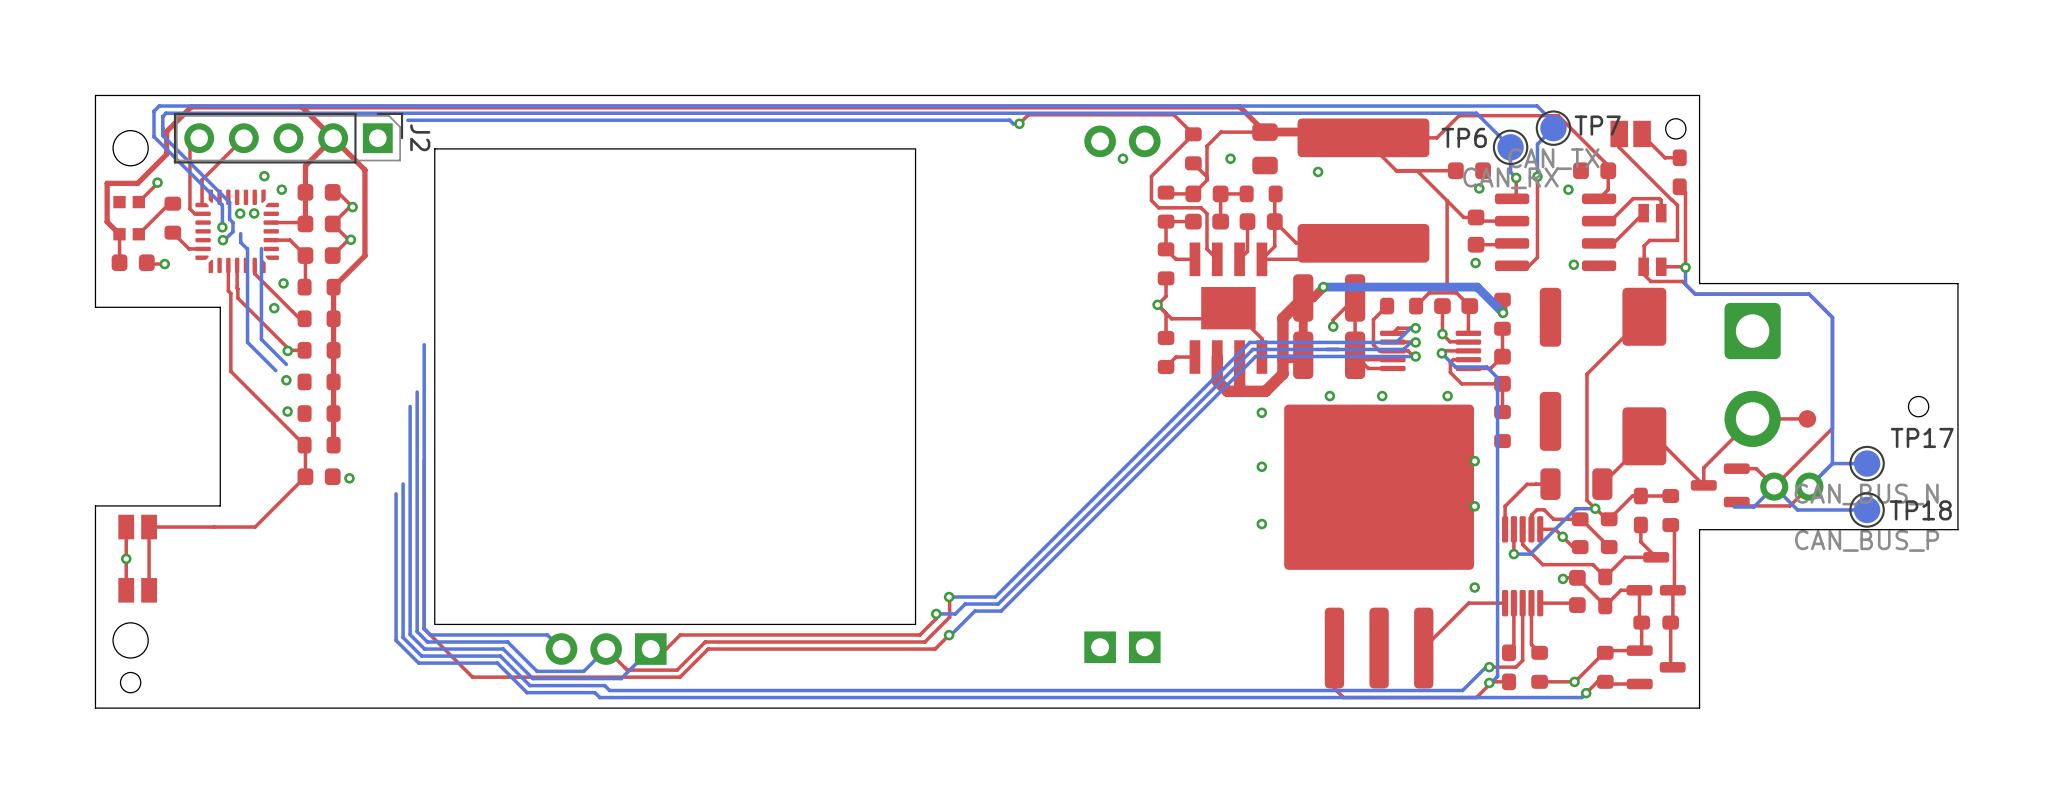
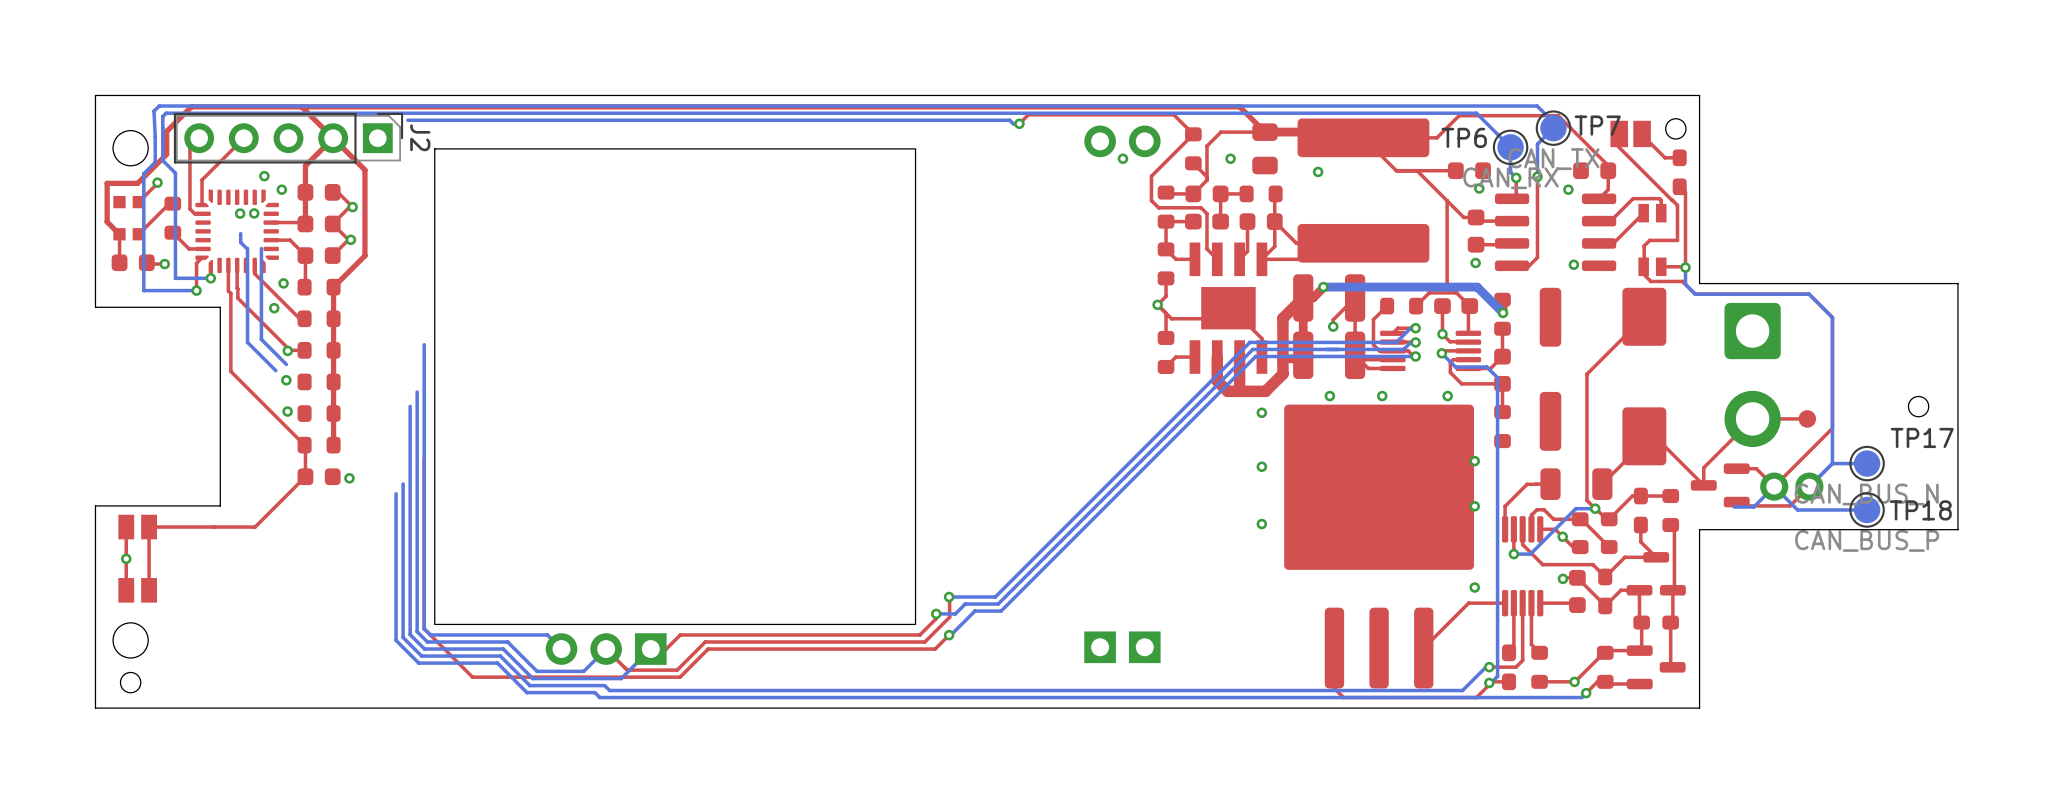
bottom track: (154, 111) (154, 136) (222, 205) (222, 227) (220, 225) -> (154, 111) (155, 162) (143, 173) (143, 290) (196, 290)
bottom track: (162, 135) (229, 202) (229, 219) (232, 222) (232, 231) (222, 240) -> (162, 135) (162, 160) (175, 173) (175, 278) (210, 278)
via: (222, 227) -> none
via: (222, 240) -> none
top track: none -> (202, 257) (196, 263) (196, 290)
via: none -> (210, 278)
via: none -> (196, 290)

